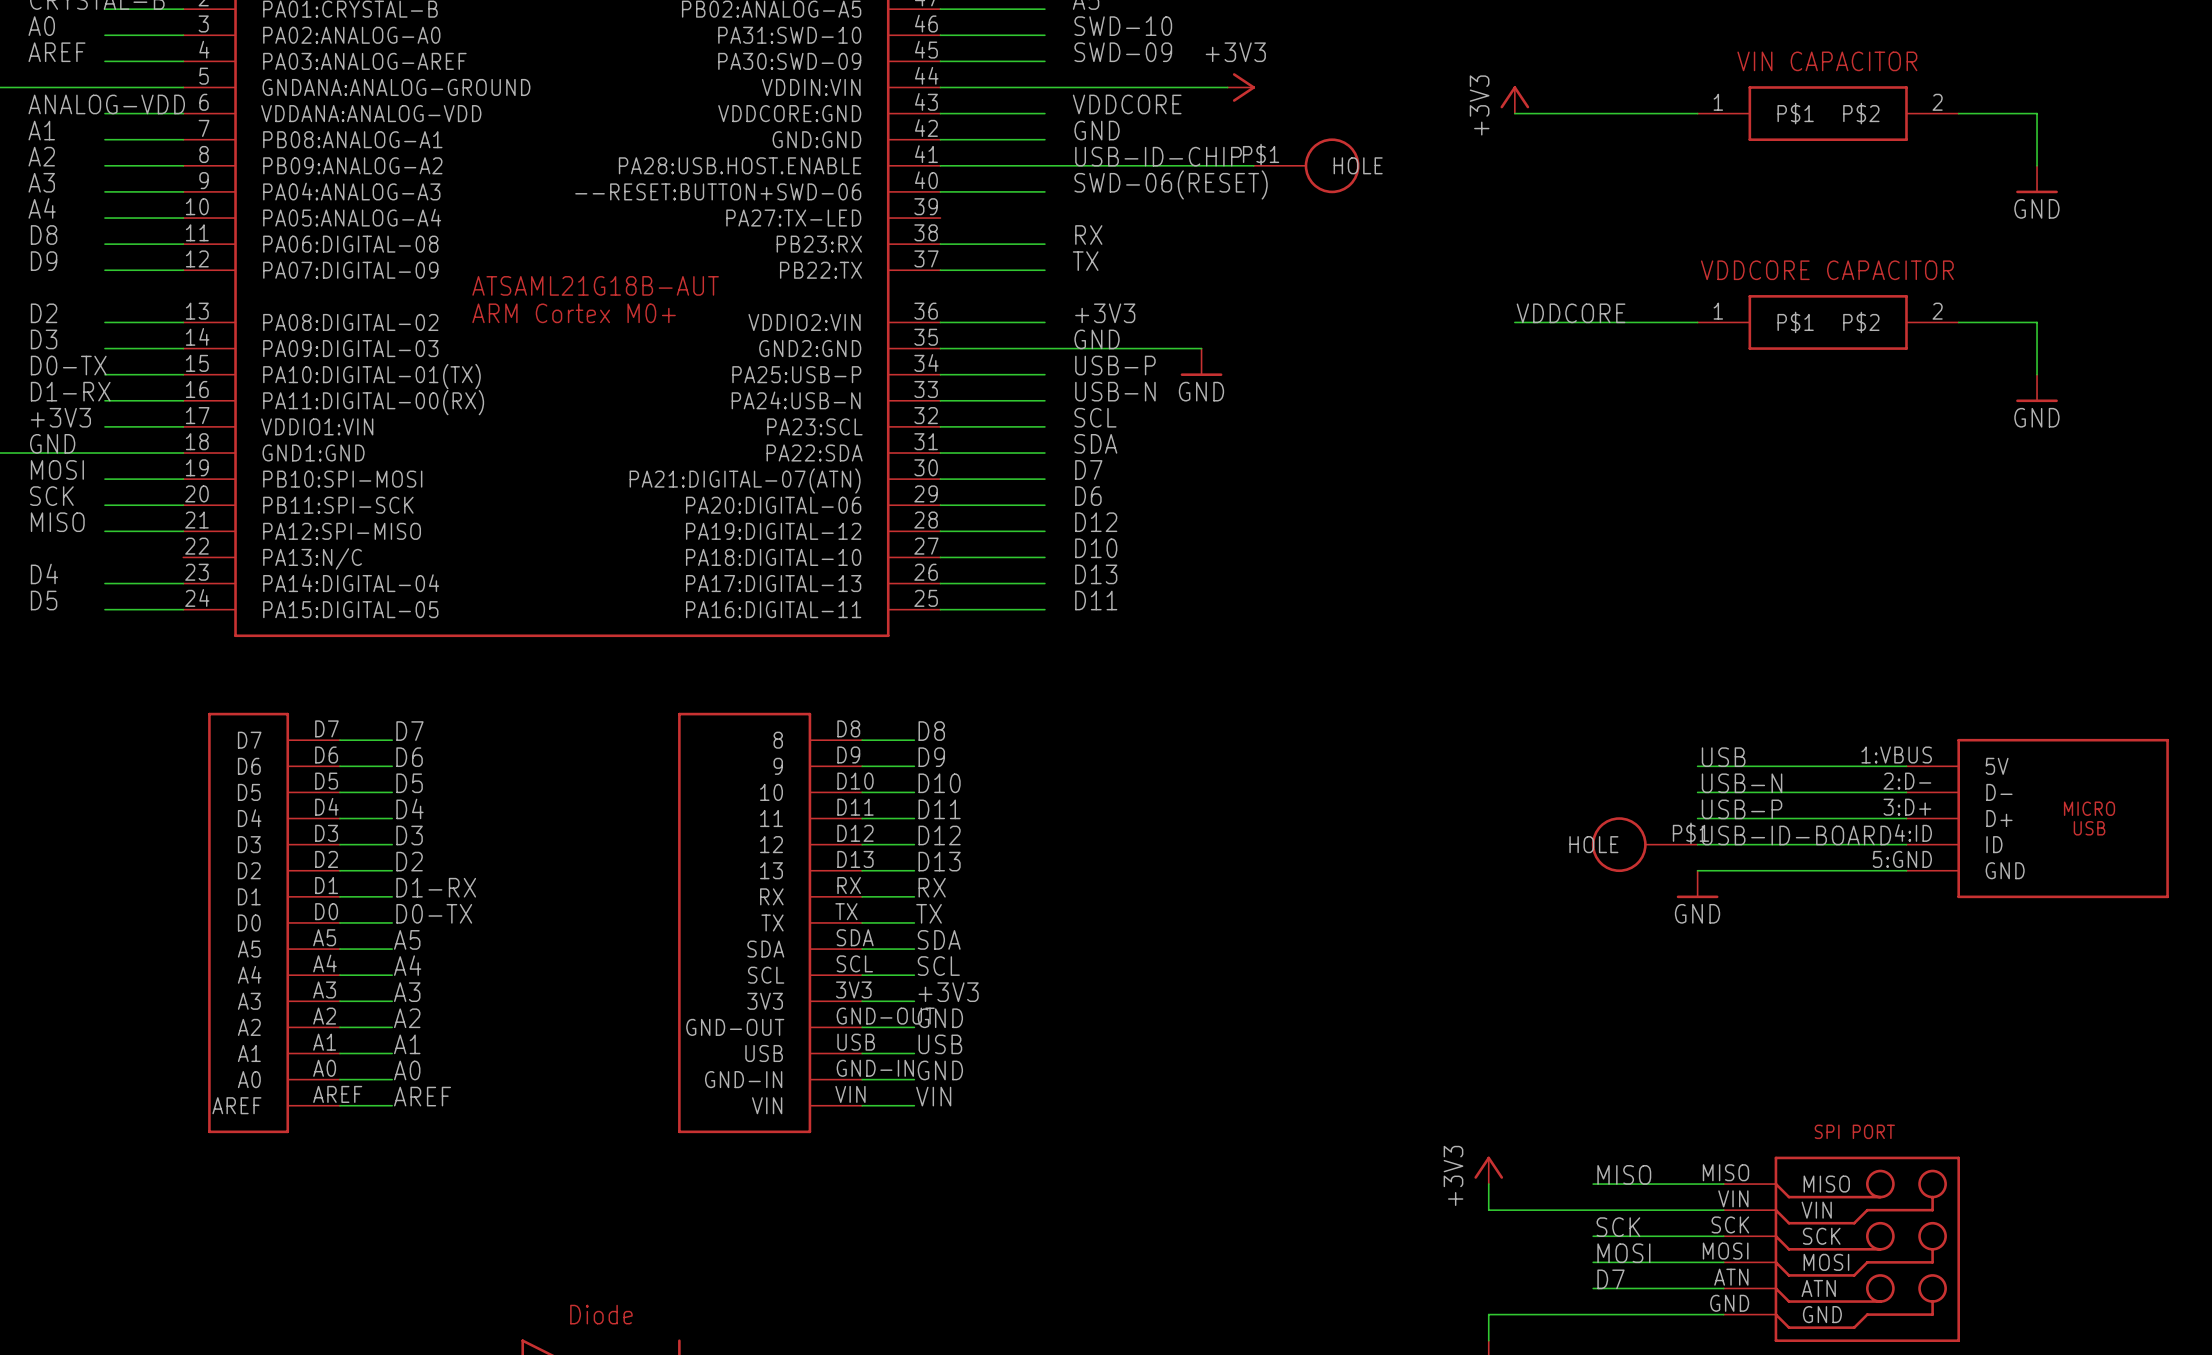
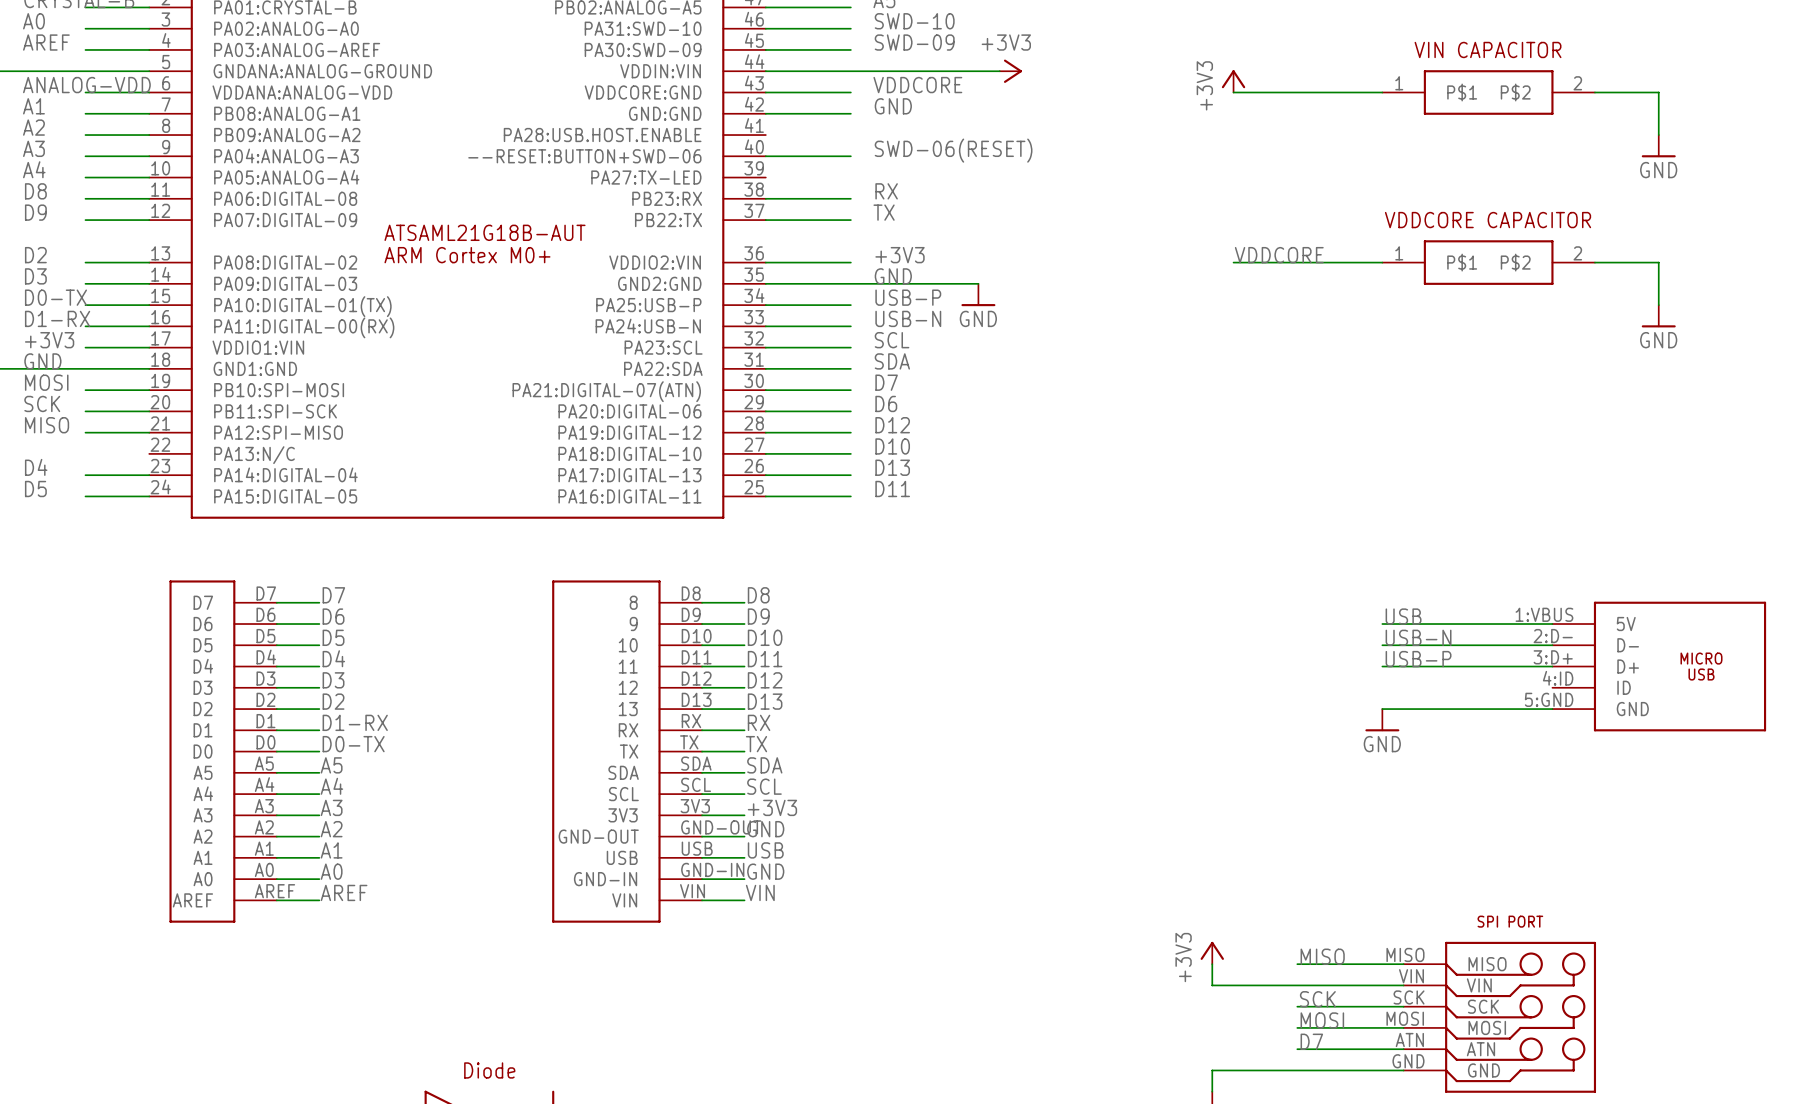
label: USB-ID-CHIP (1158, 156) -> none
wire: (940, 165) (1253, 165) -> none
part: (1306, 165) -> none
label: USB-ID-BOARD (1796, 835) -> none
part: (1644, 844) -> none
wire: (1697, 844) (1906, 844) -> none

